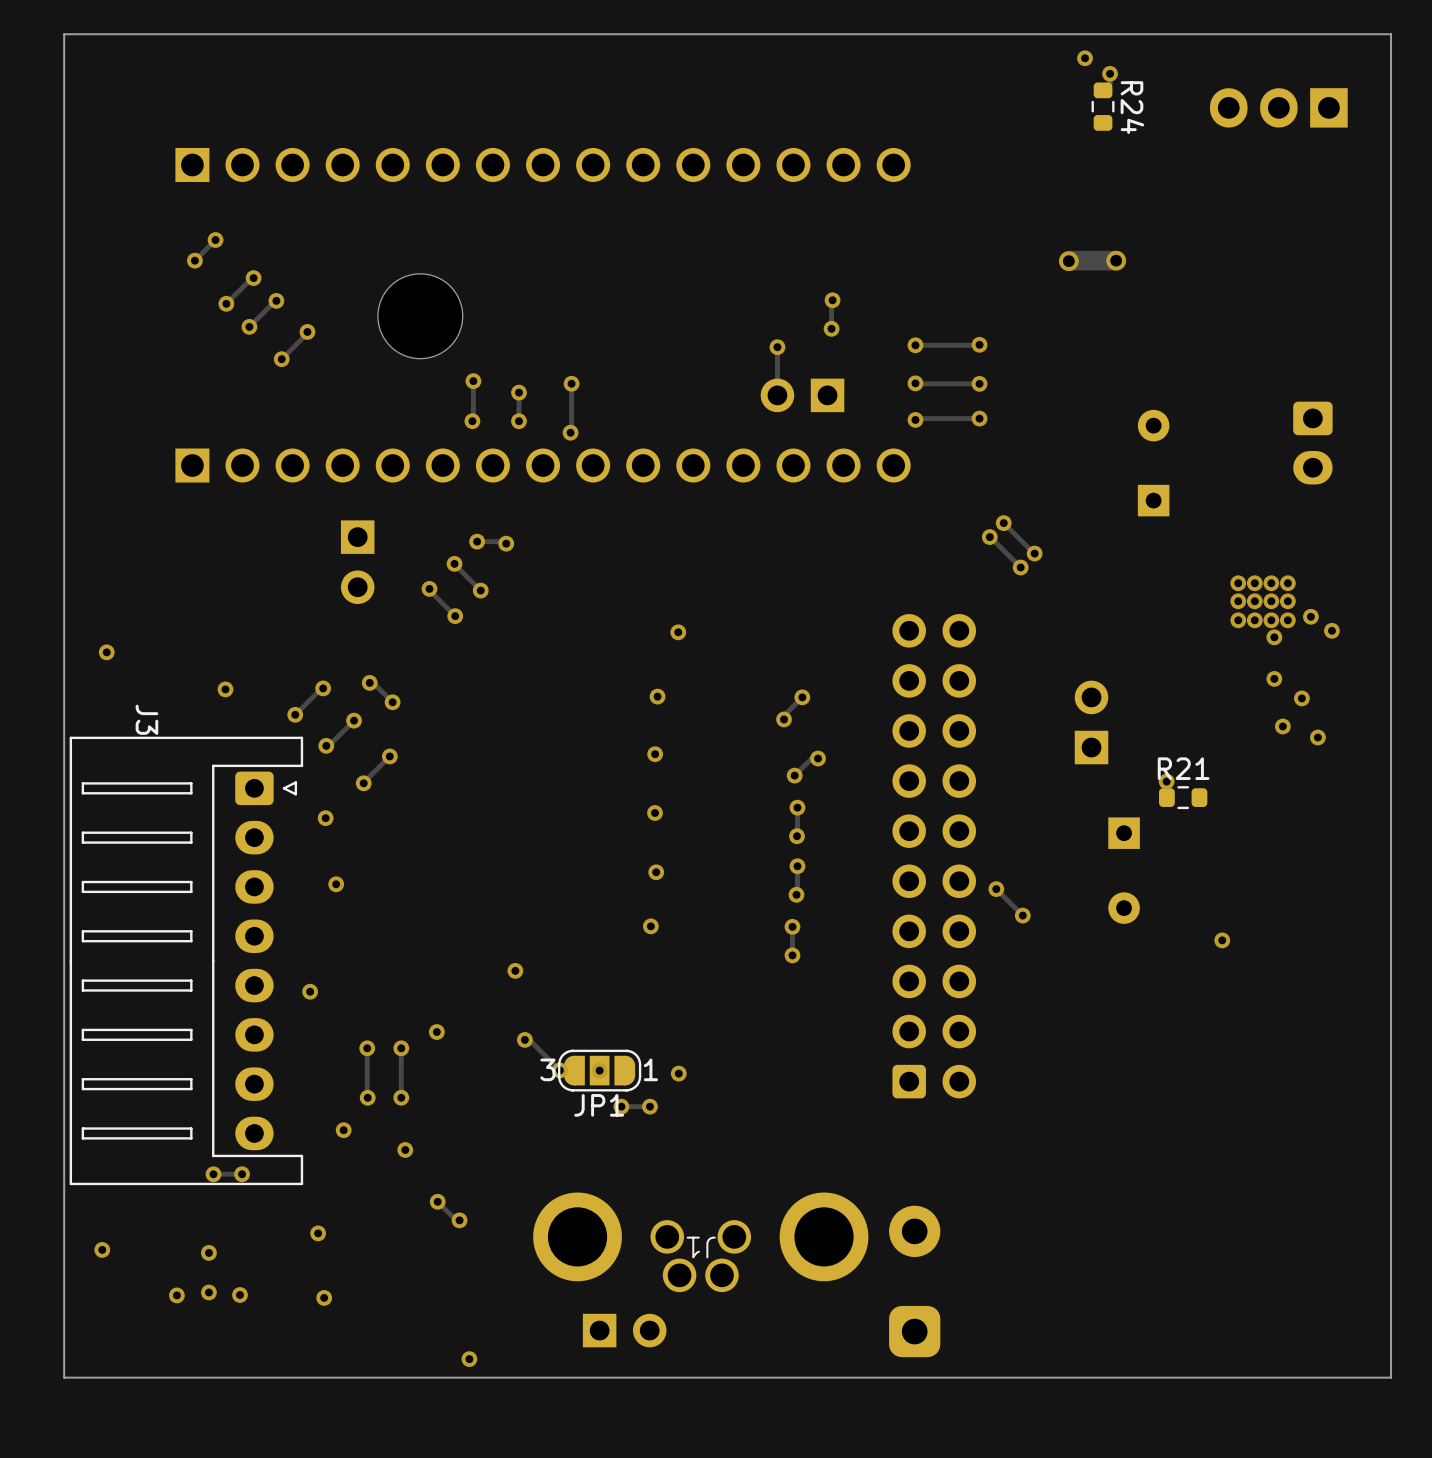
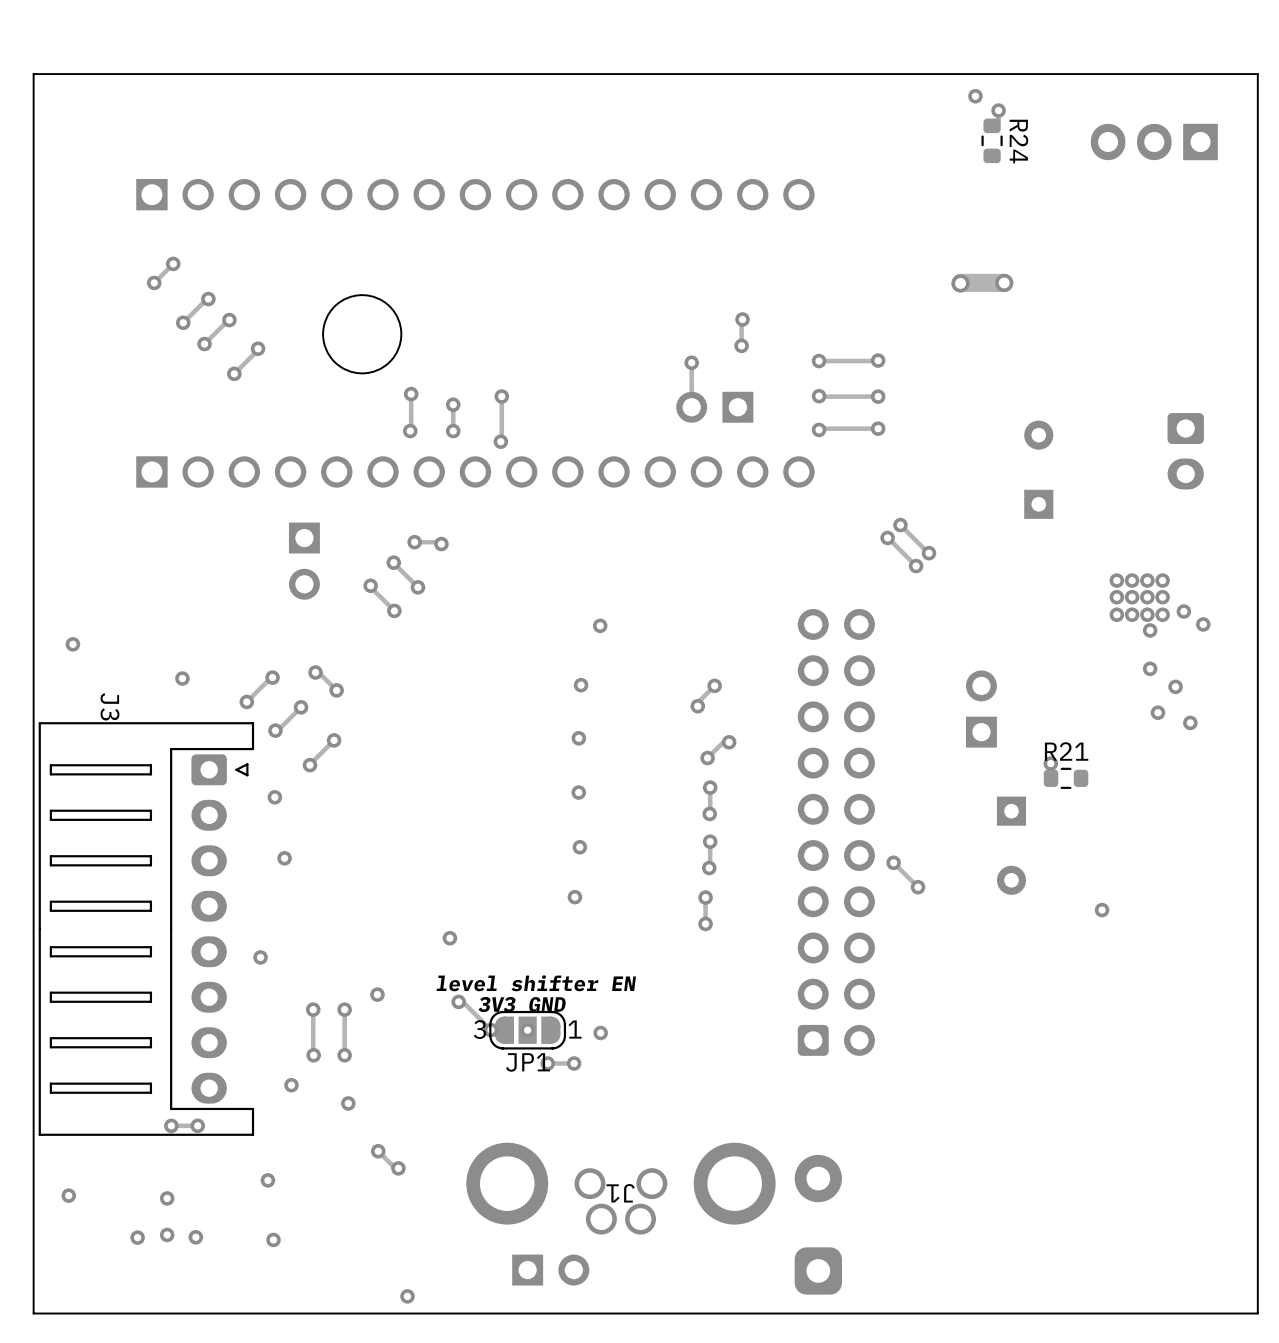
text: none -> level shifter EN (536, 983)
text: none -> 3V3 GND (522, 1004)

